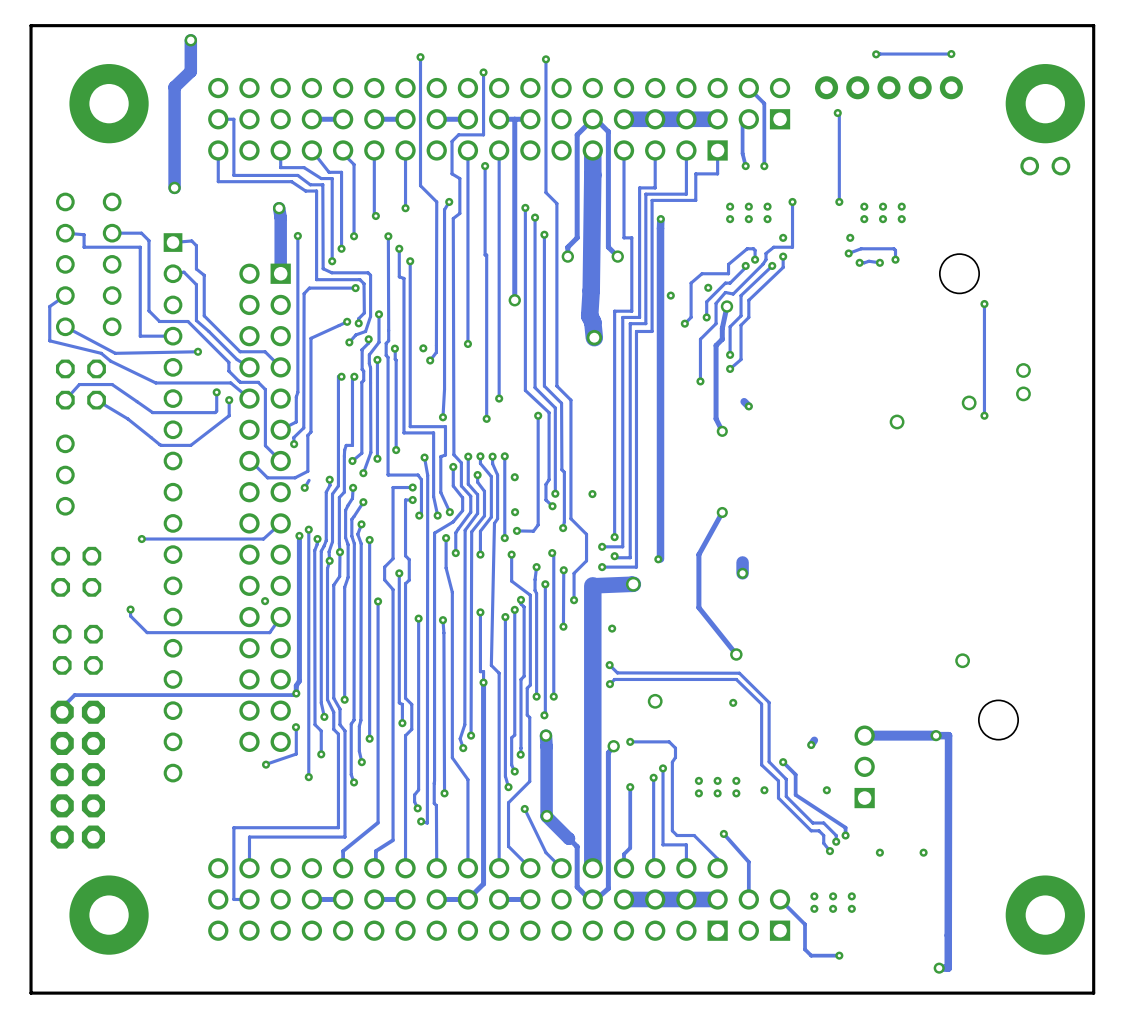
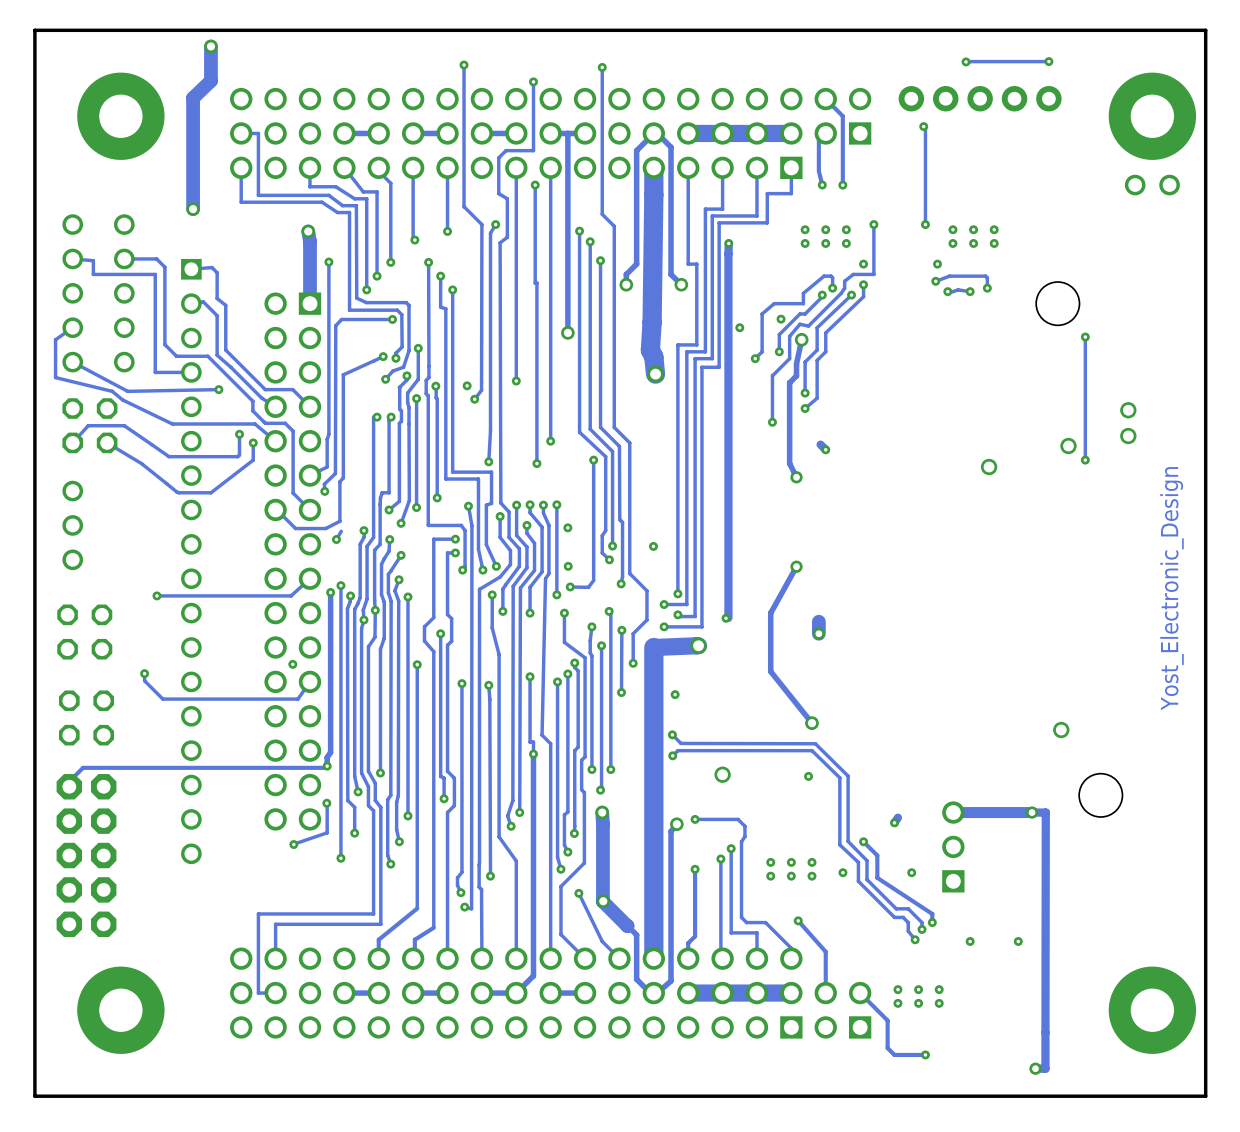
text: none -> Yost_Electronic_Design (1172, 588)

